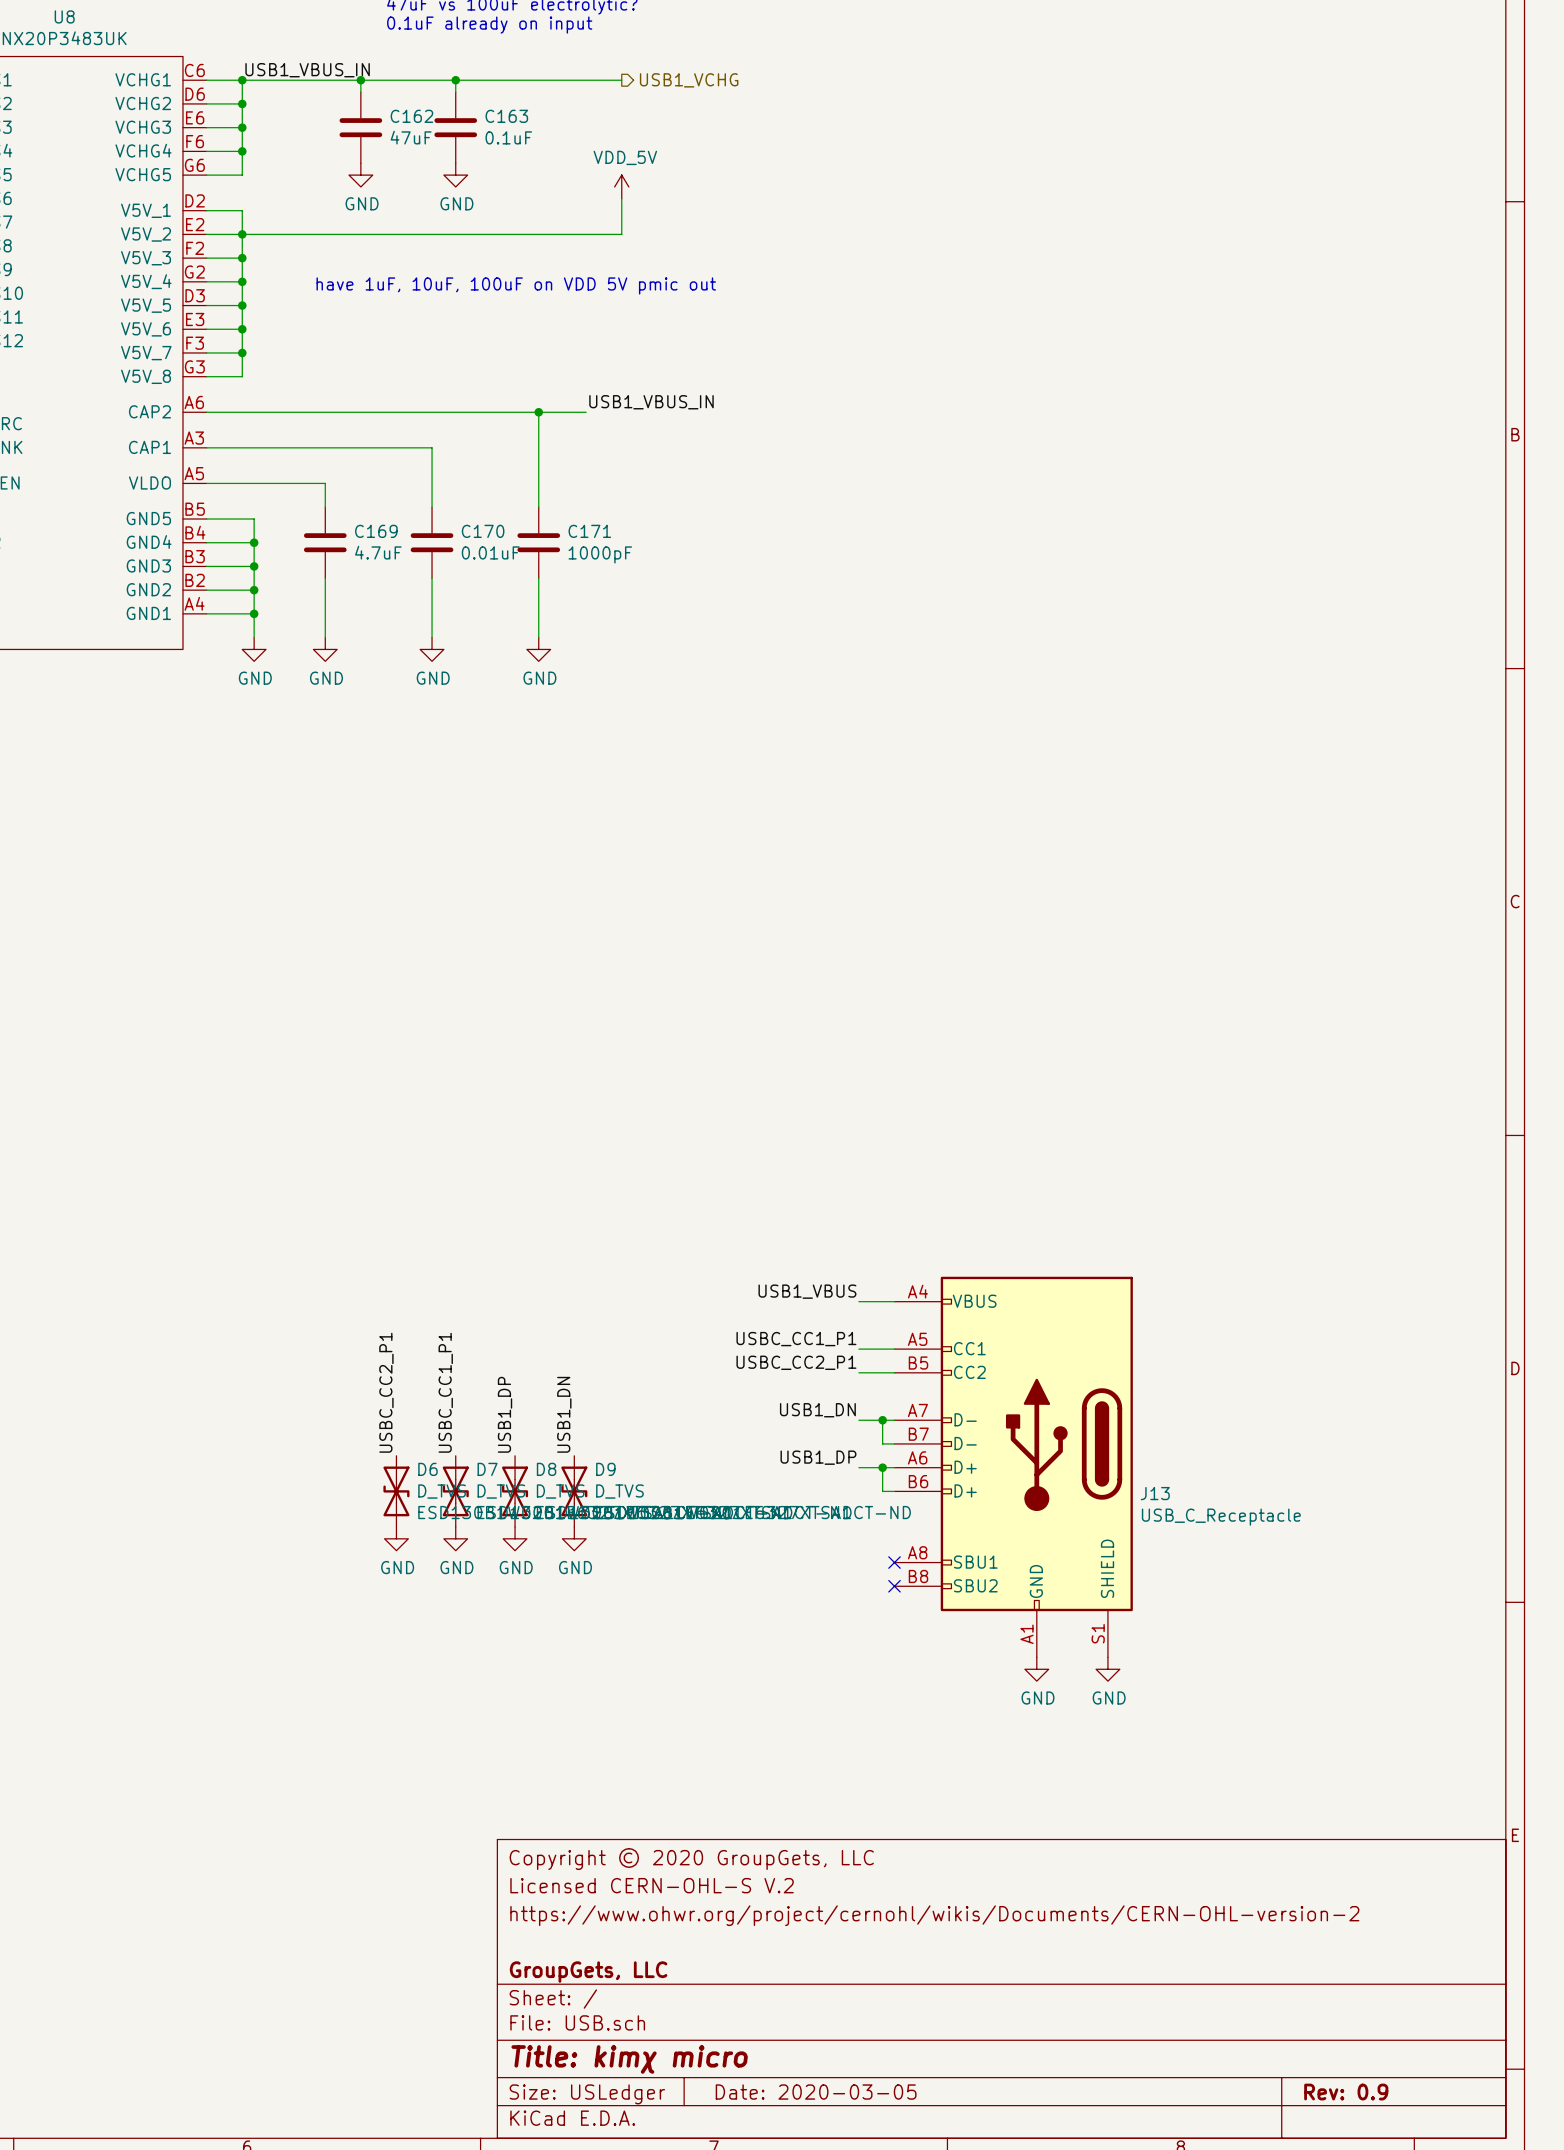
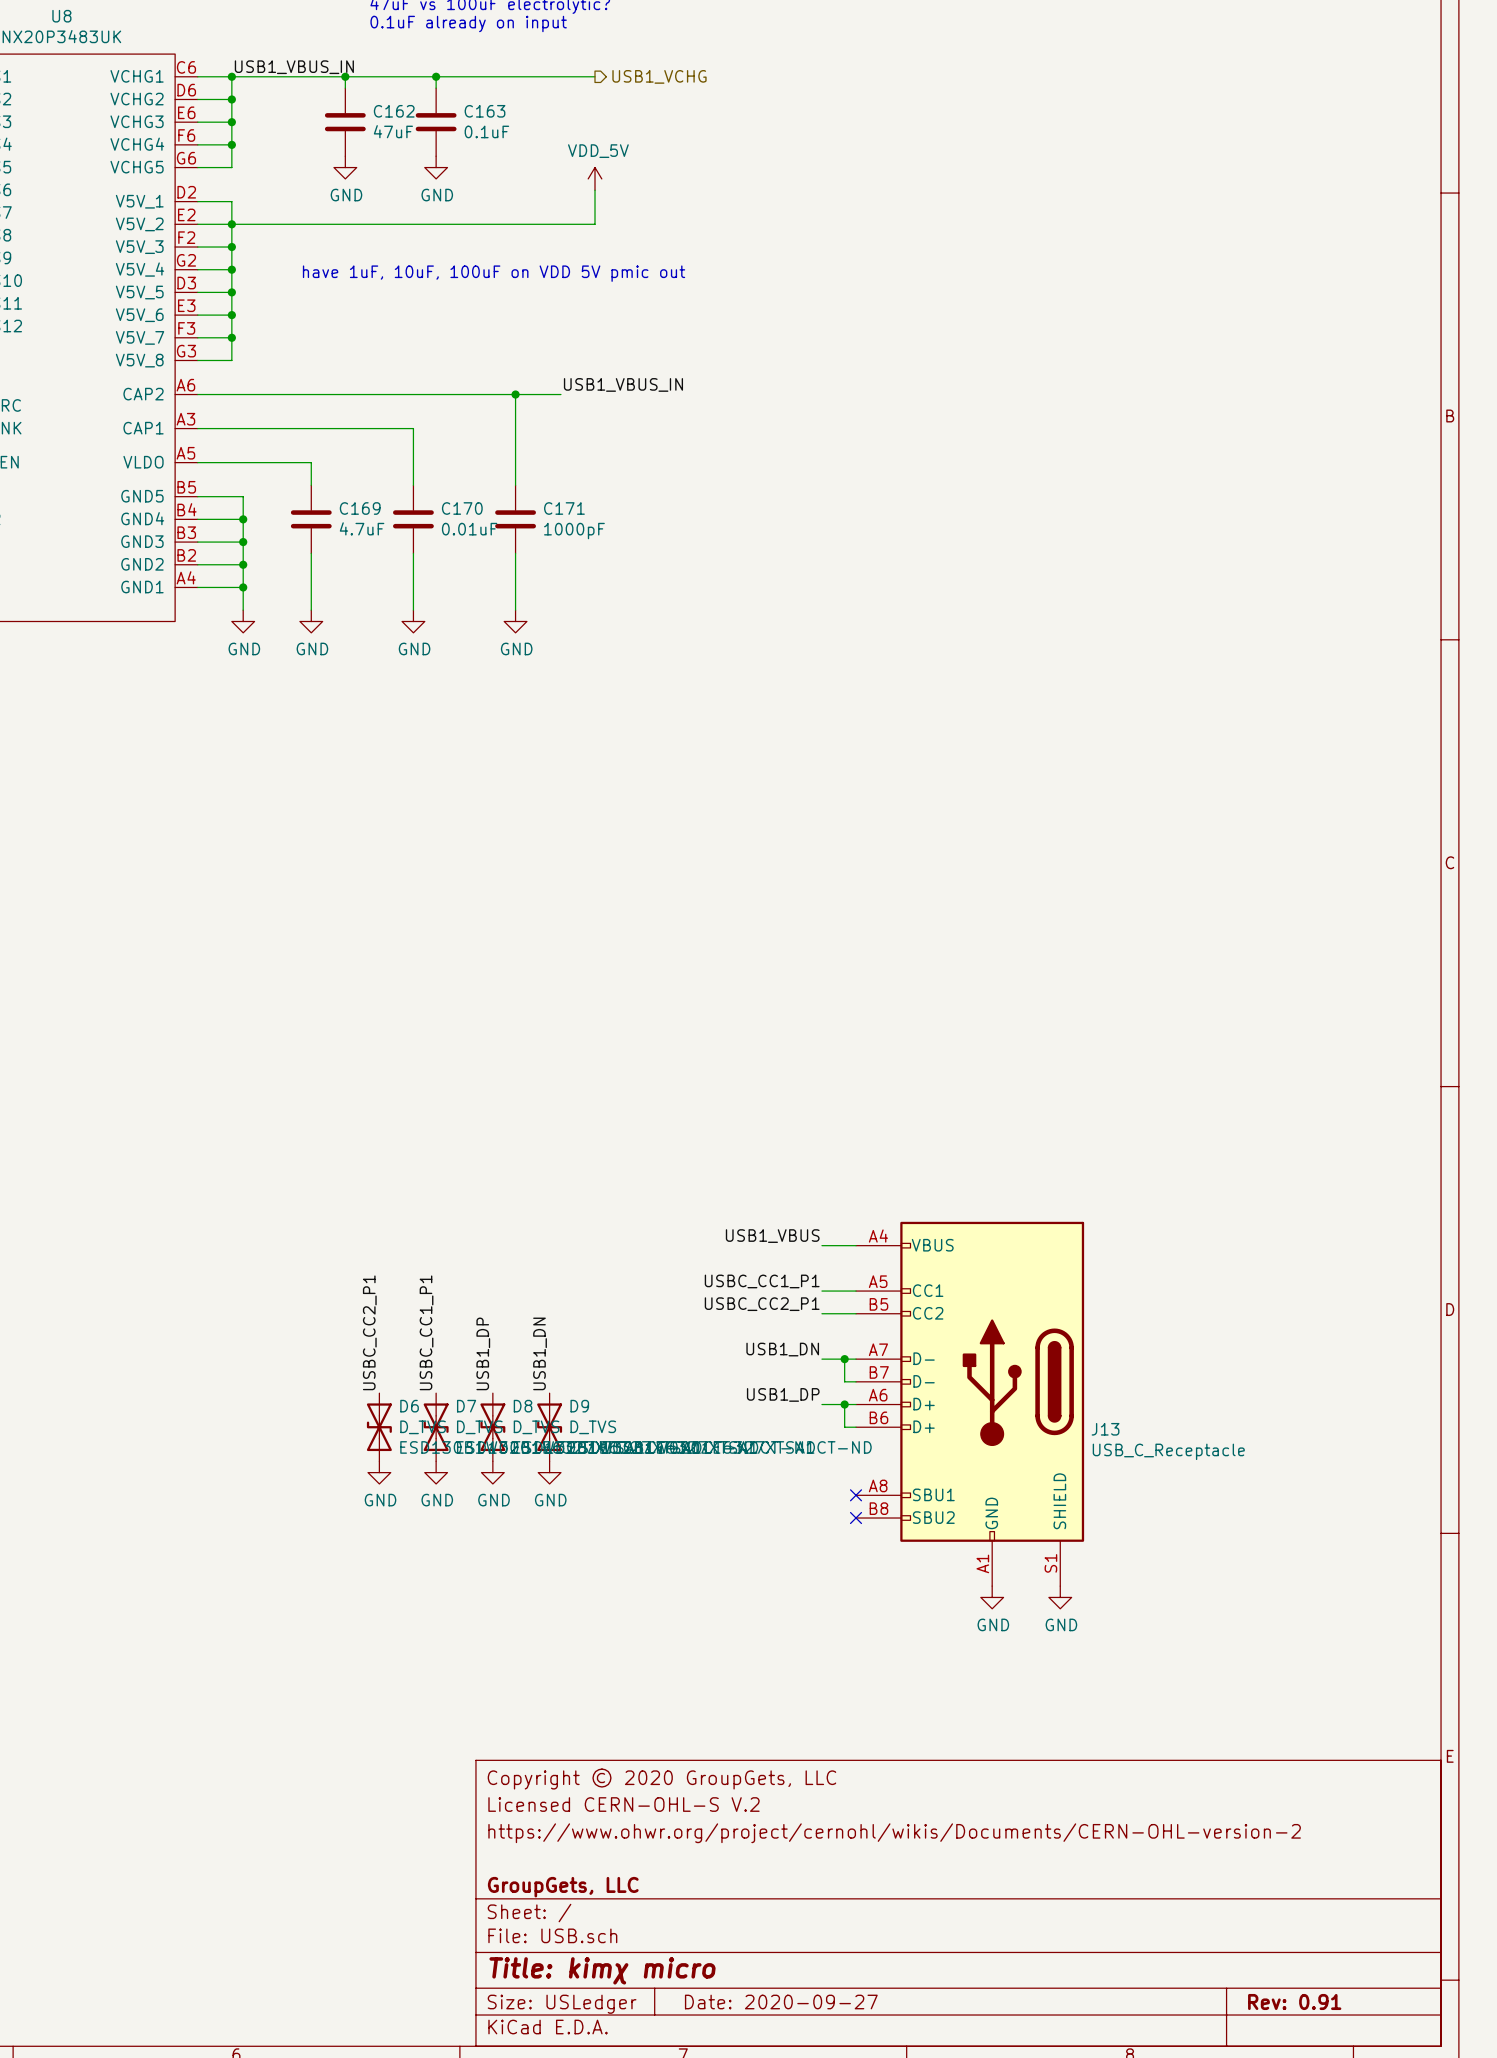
title block: Date: 2020-03-05 (816, 2092) -> Date: 2020-09-27 (781, 2001)
title block: Rev: 0.9 (1346, 2092) -> Rev: 0.91 (1294, 2001)

